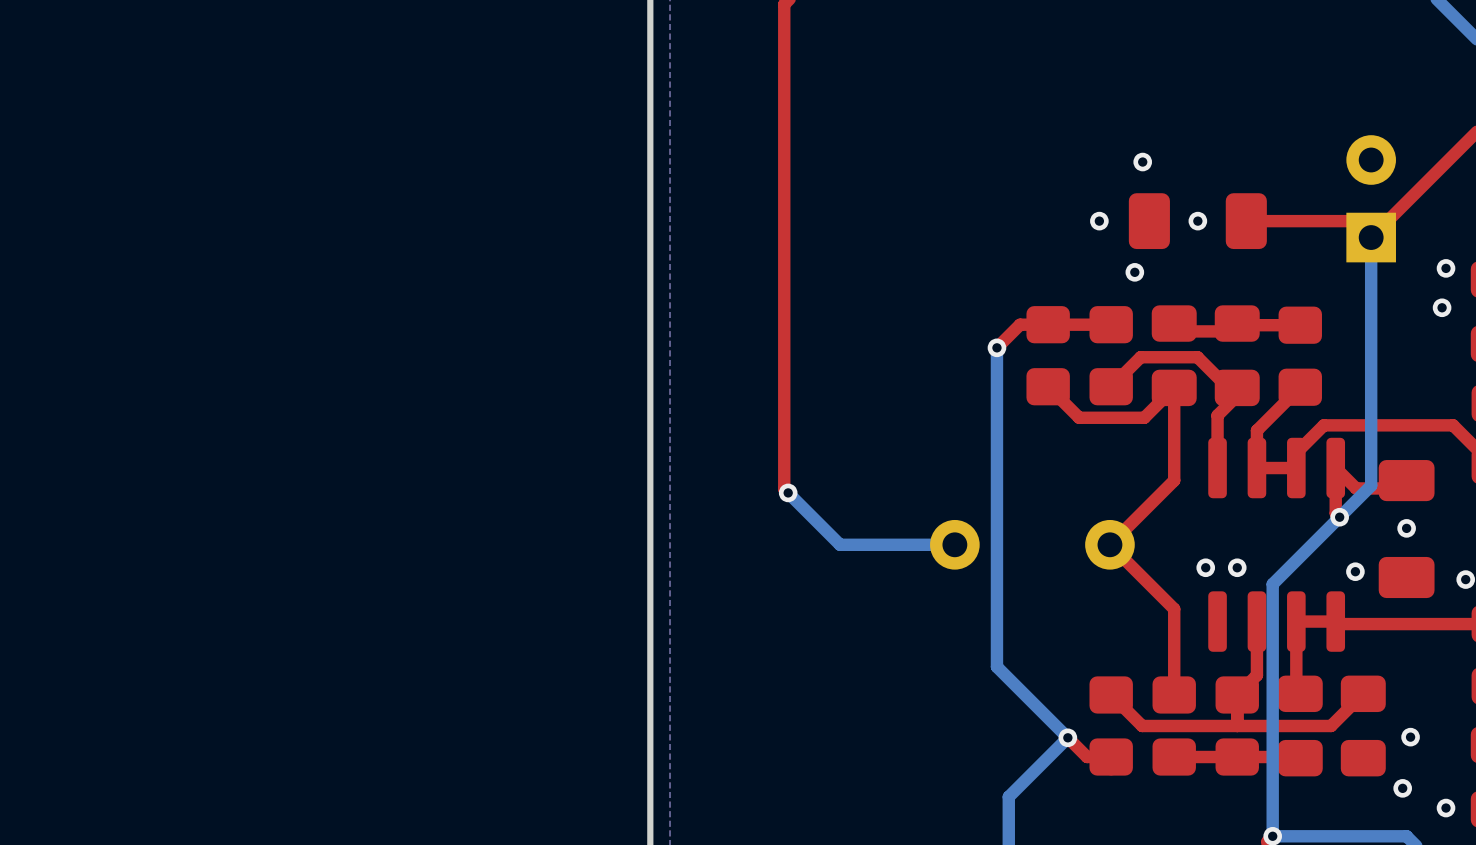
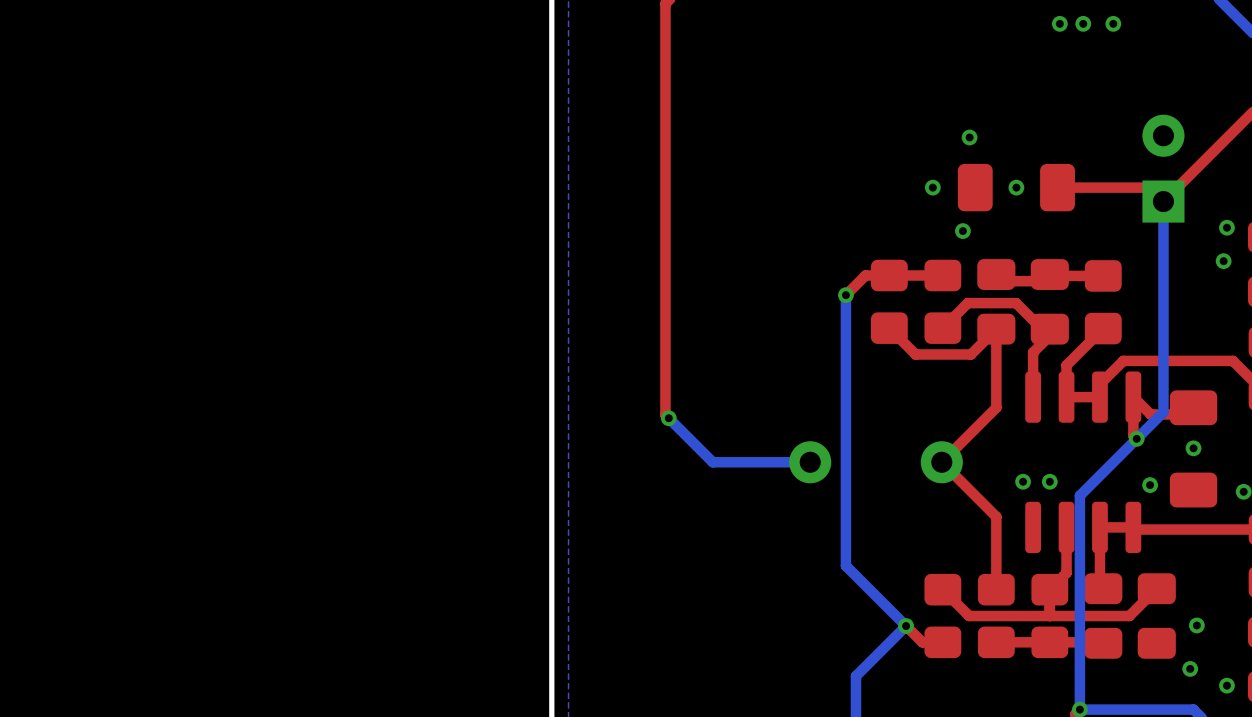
via: none -> (1059, 23)
via: none -> (1083, 23)
via: none -> (1113, 23)

